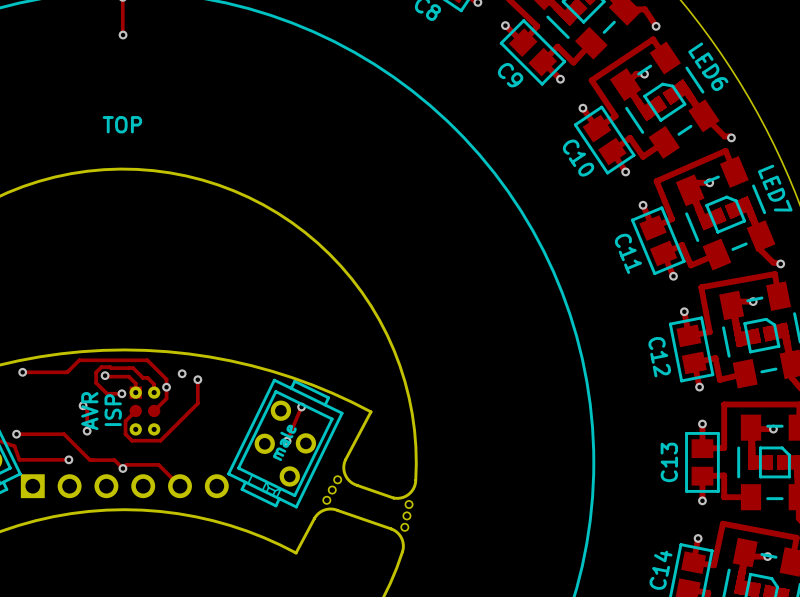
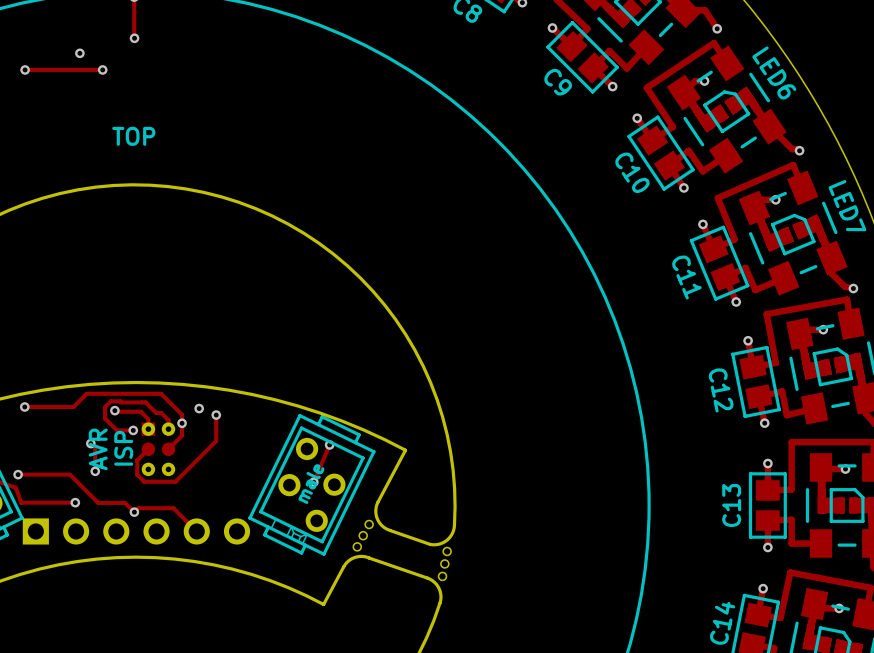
via: none -> (79, 53)
track: none -> (25, 69) (102, 69)
via: none -> (25, 69)
via: none -> (102, 69)

